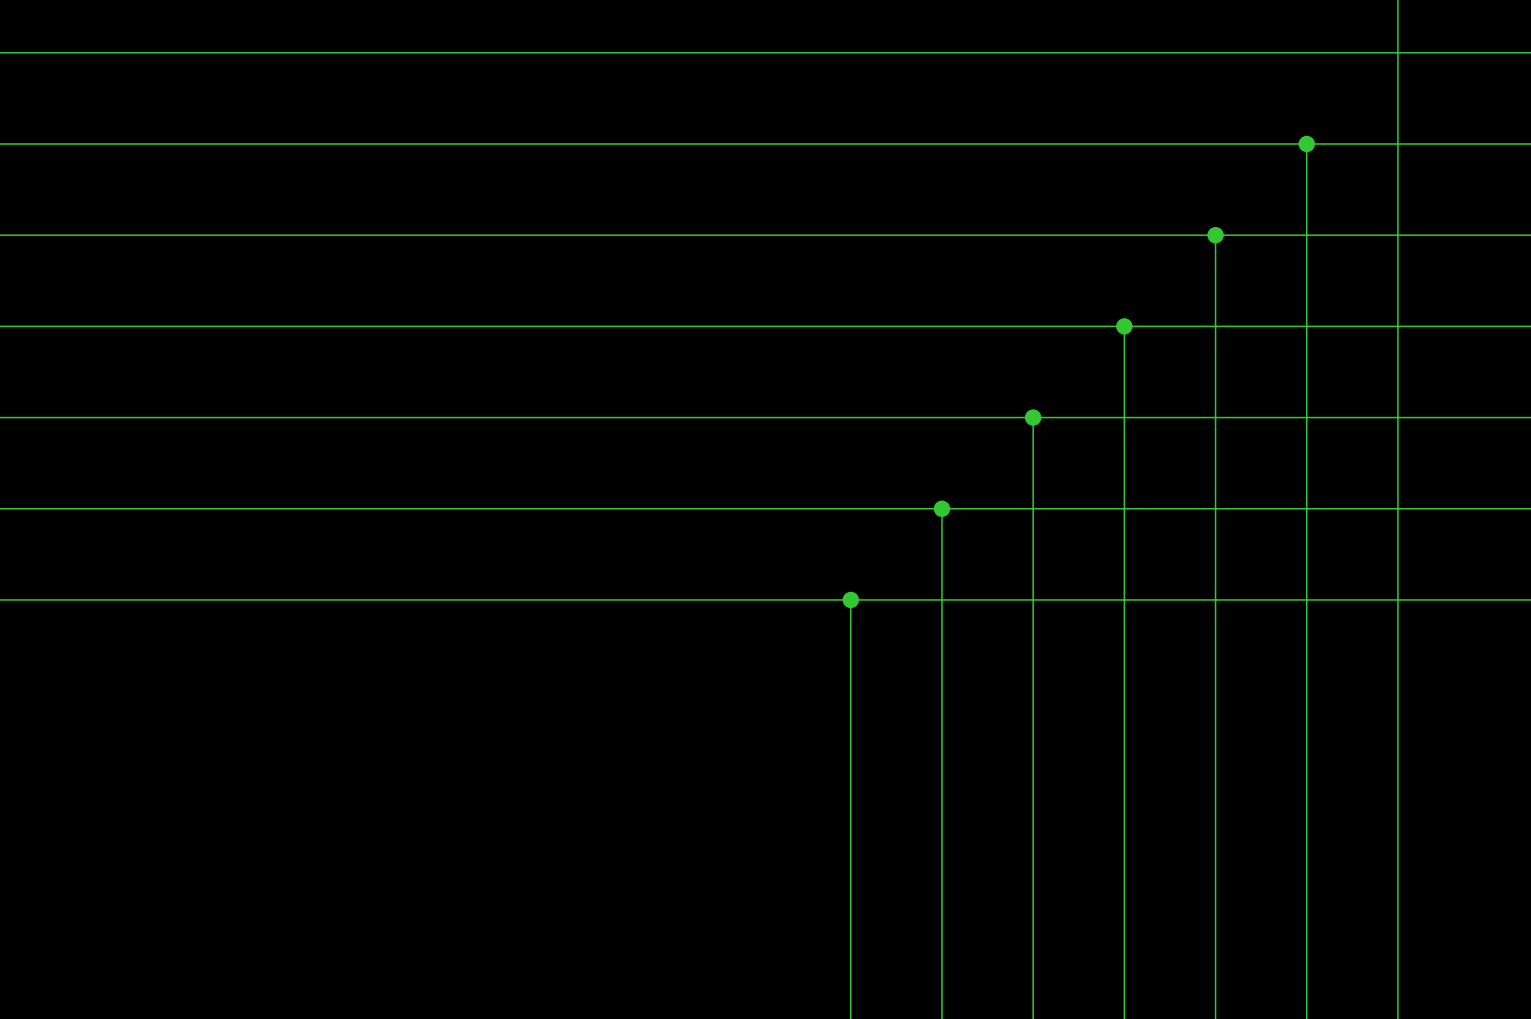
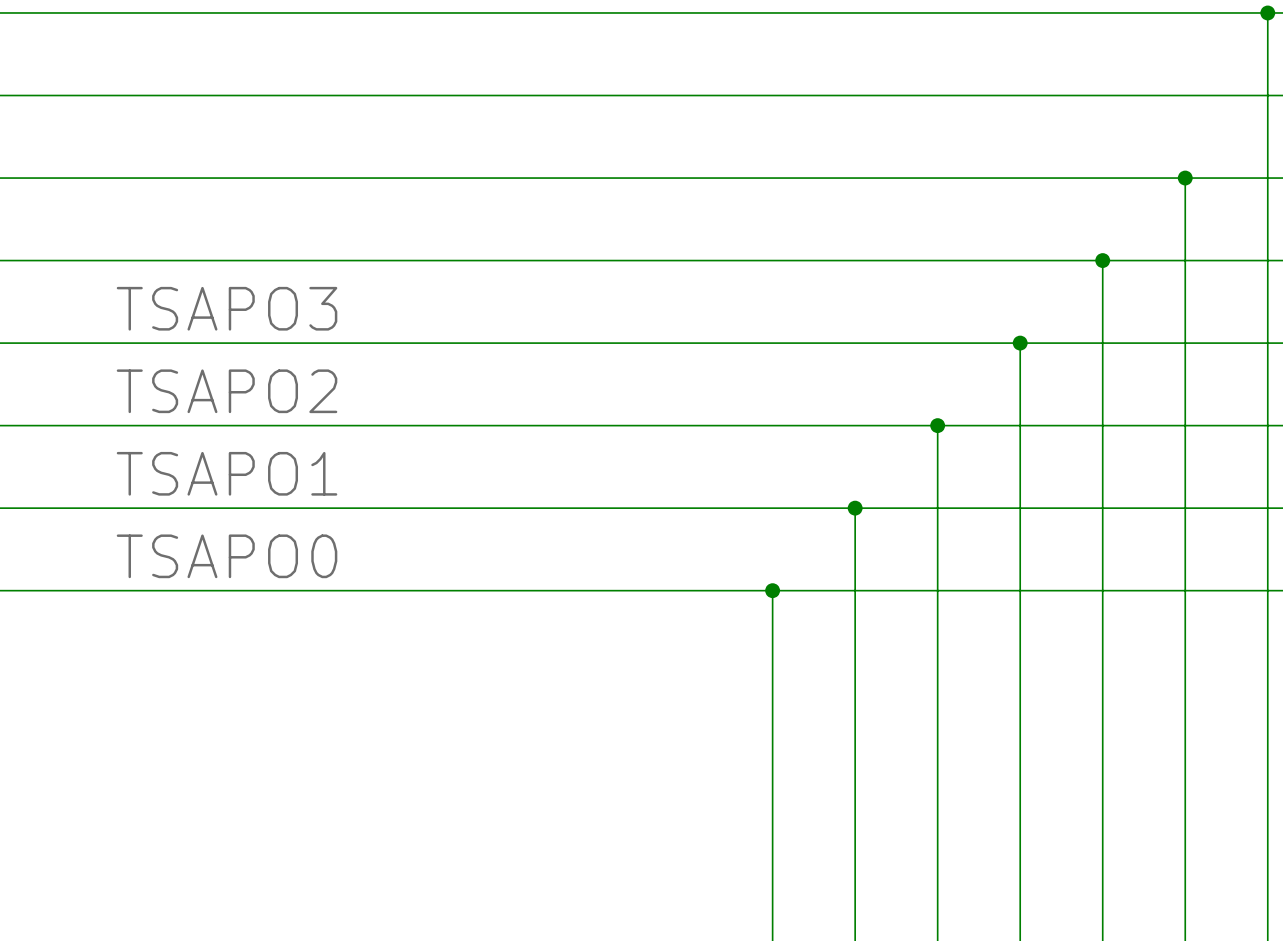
label: none -> TSAPO3 (227, 308)
label: none -> TSAPO2 (227, 391)
label: none -> TSAPO1 (227, 473)
label: none -> TSAPO0 (227, 556)

